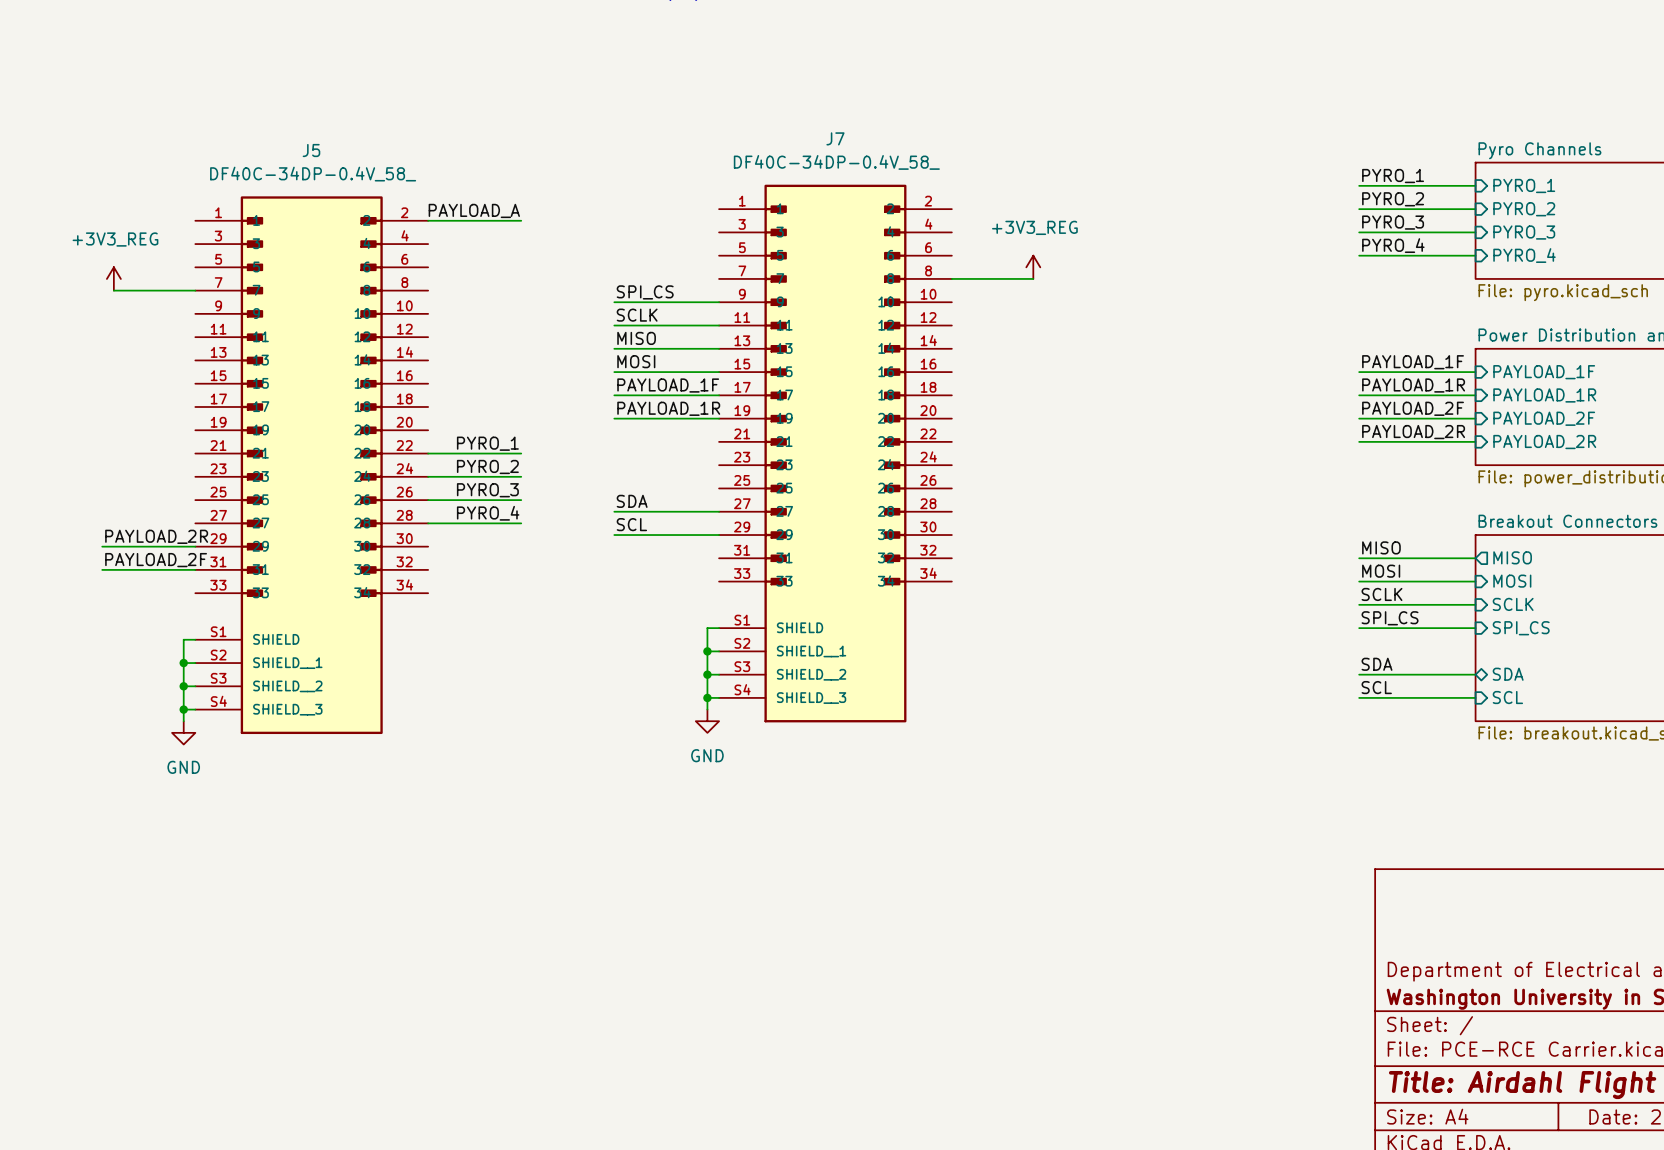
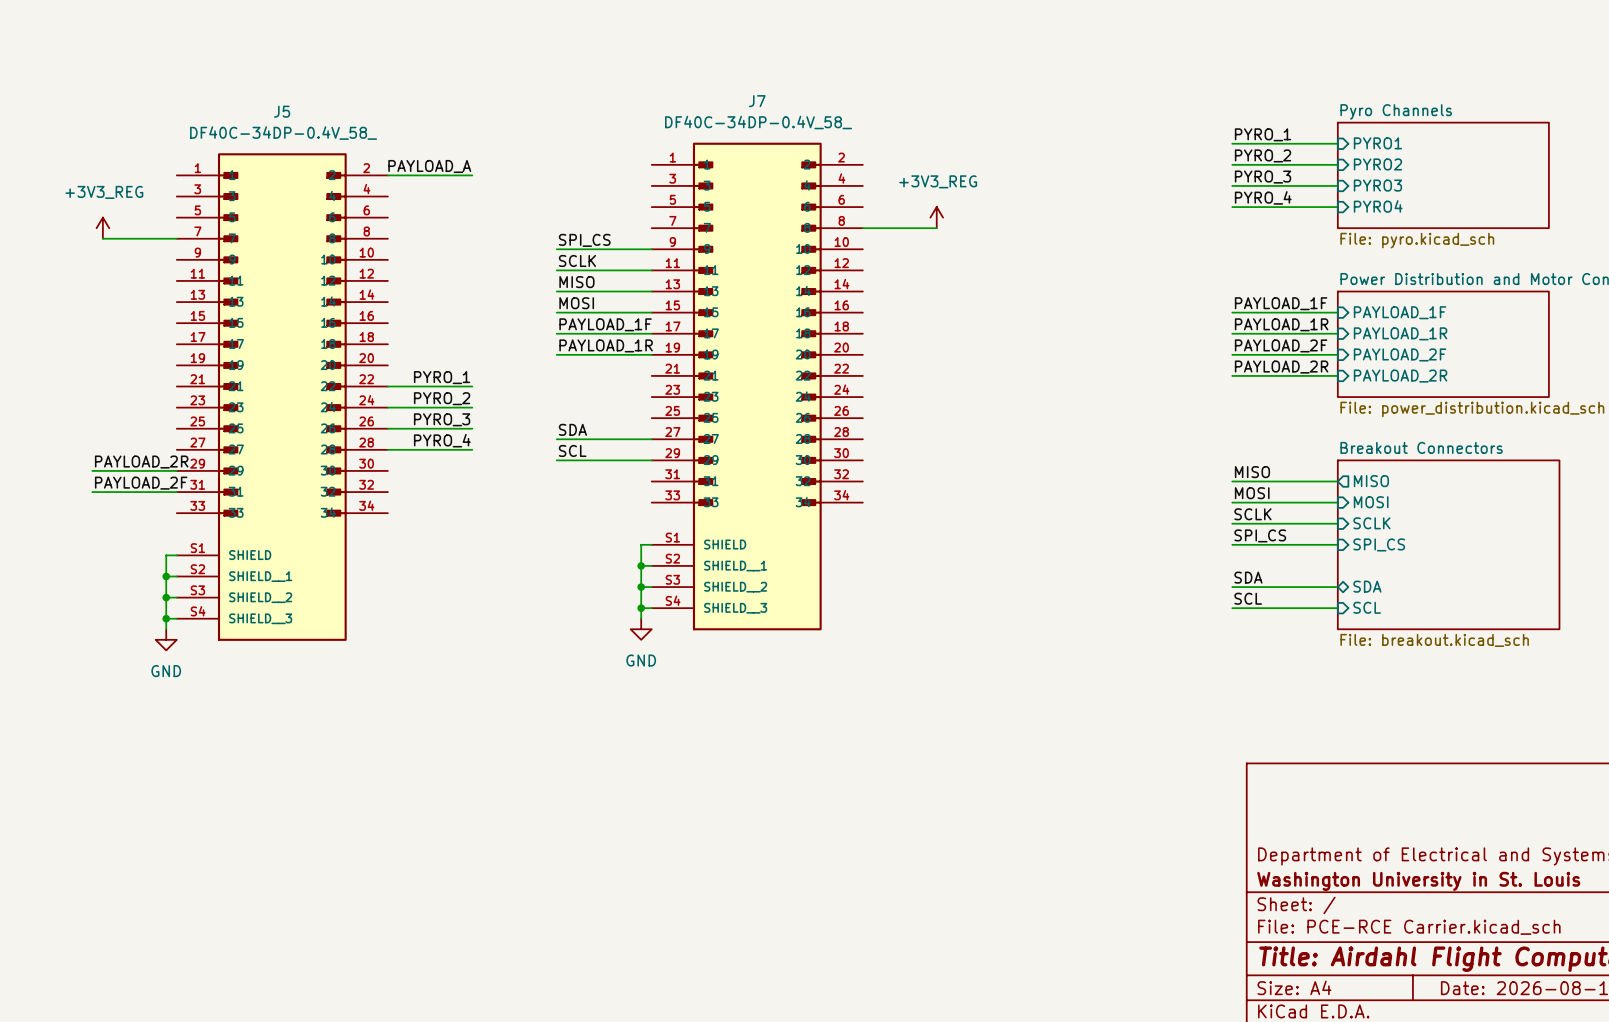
sheet pin: PYRO_1 (1524, 185) -> PYRO1 (1377, 143)
sheet pin: PYRO_2 (1524, 209) -> PYRO2 (1377, 164)
sheet pin: PYRO_3 (1524, 232) -> PYRO3 (1377, 185)
sheet pin: PYRO_4 (1524, 255) -> PYRO4 (1378, 206)

